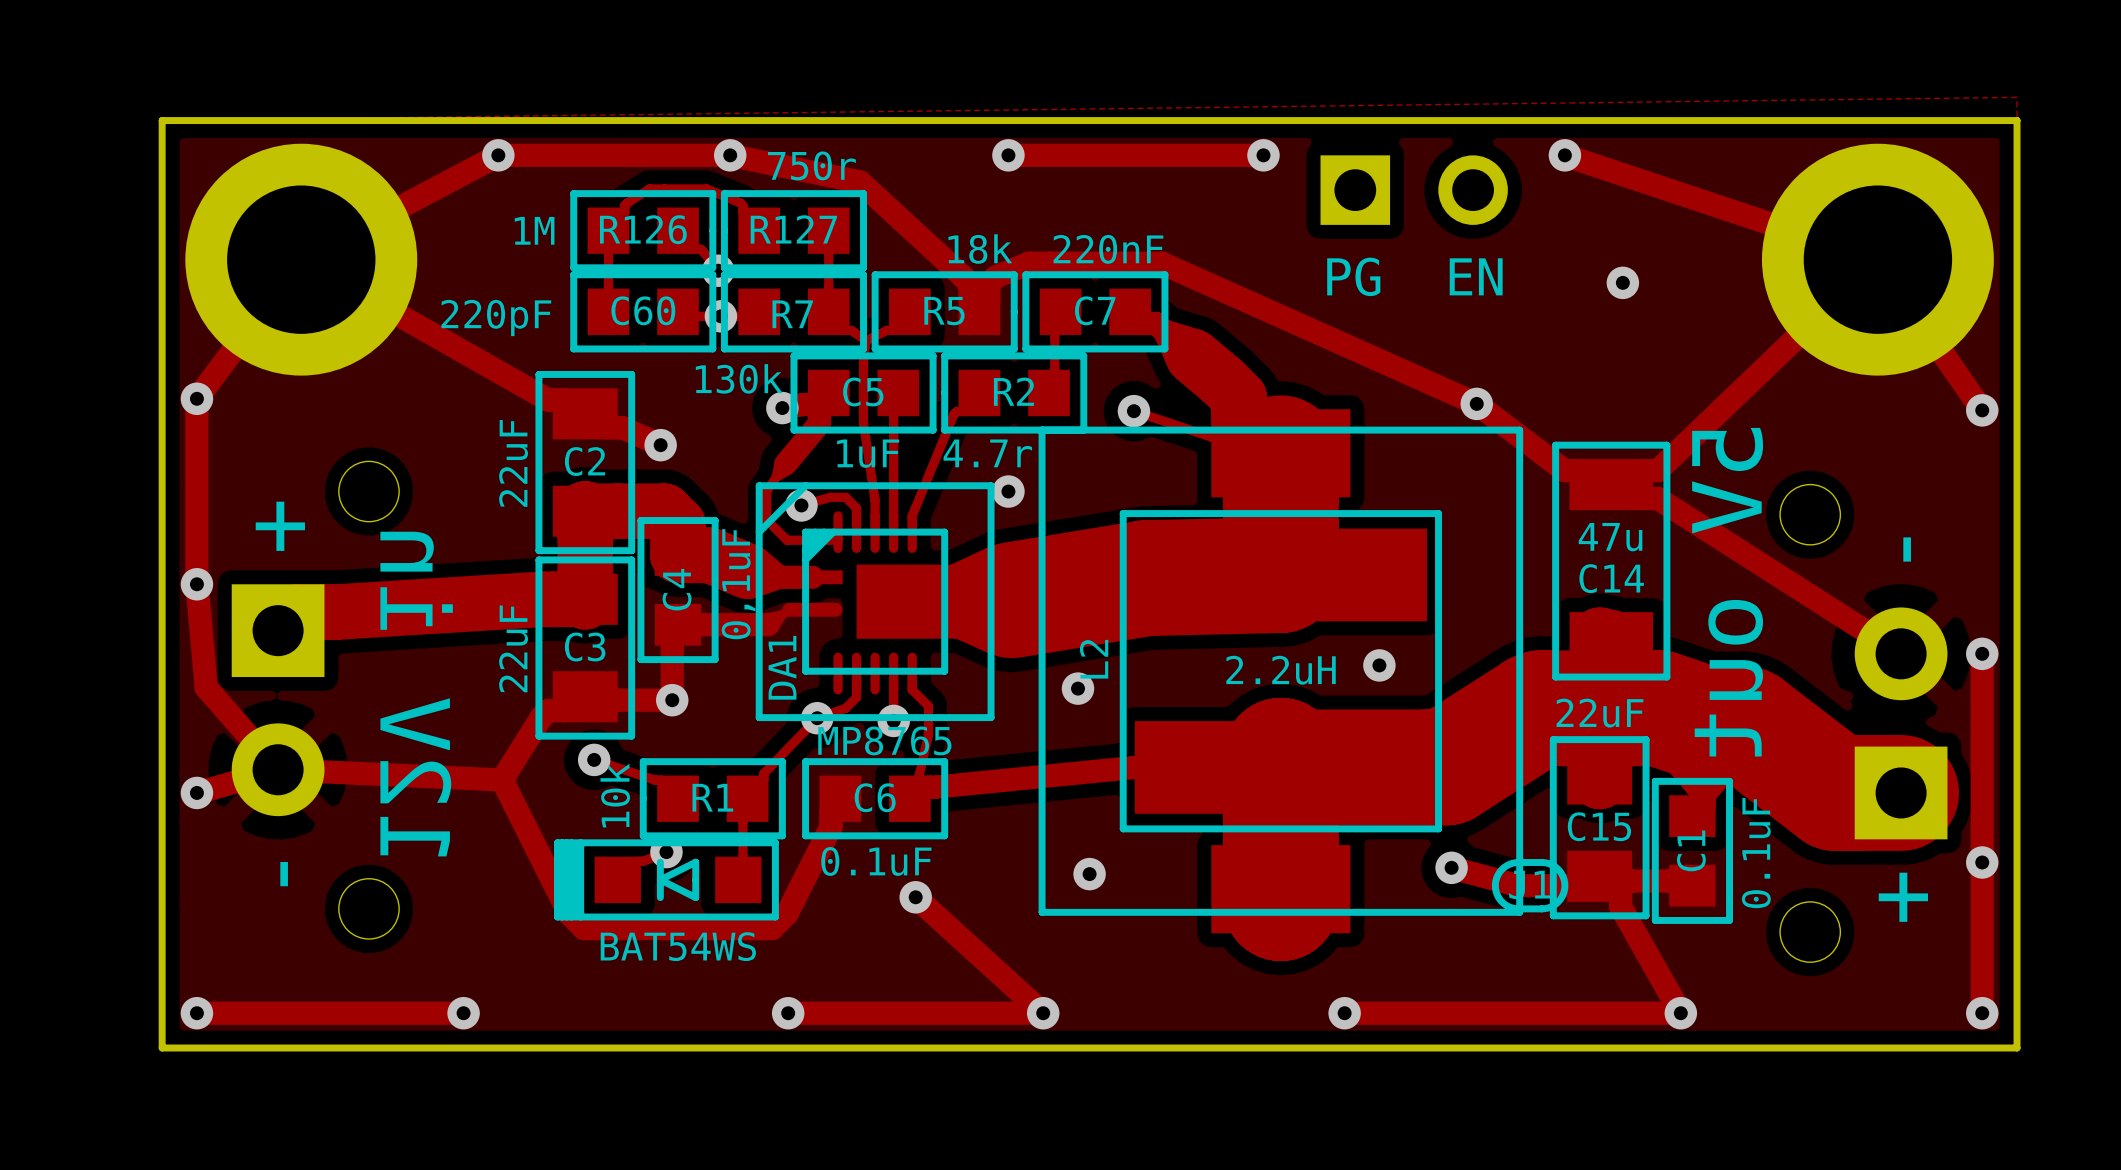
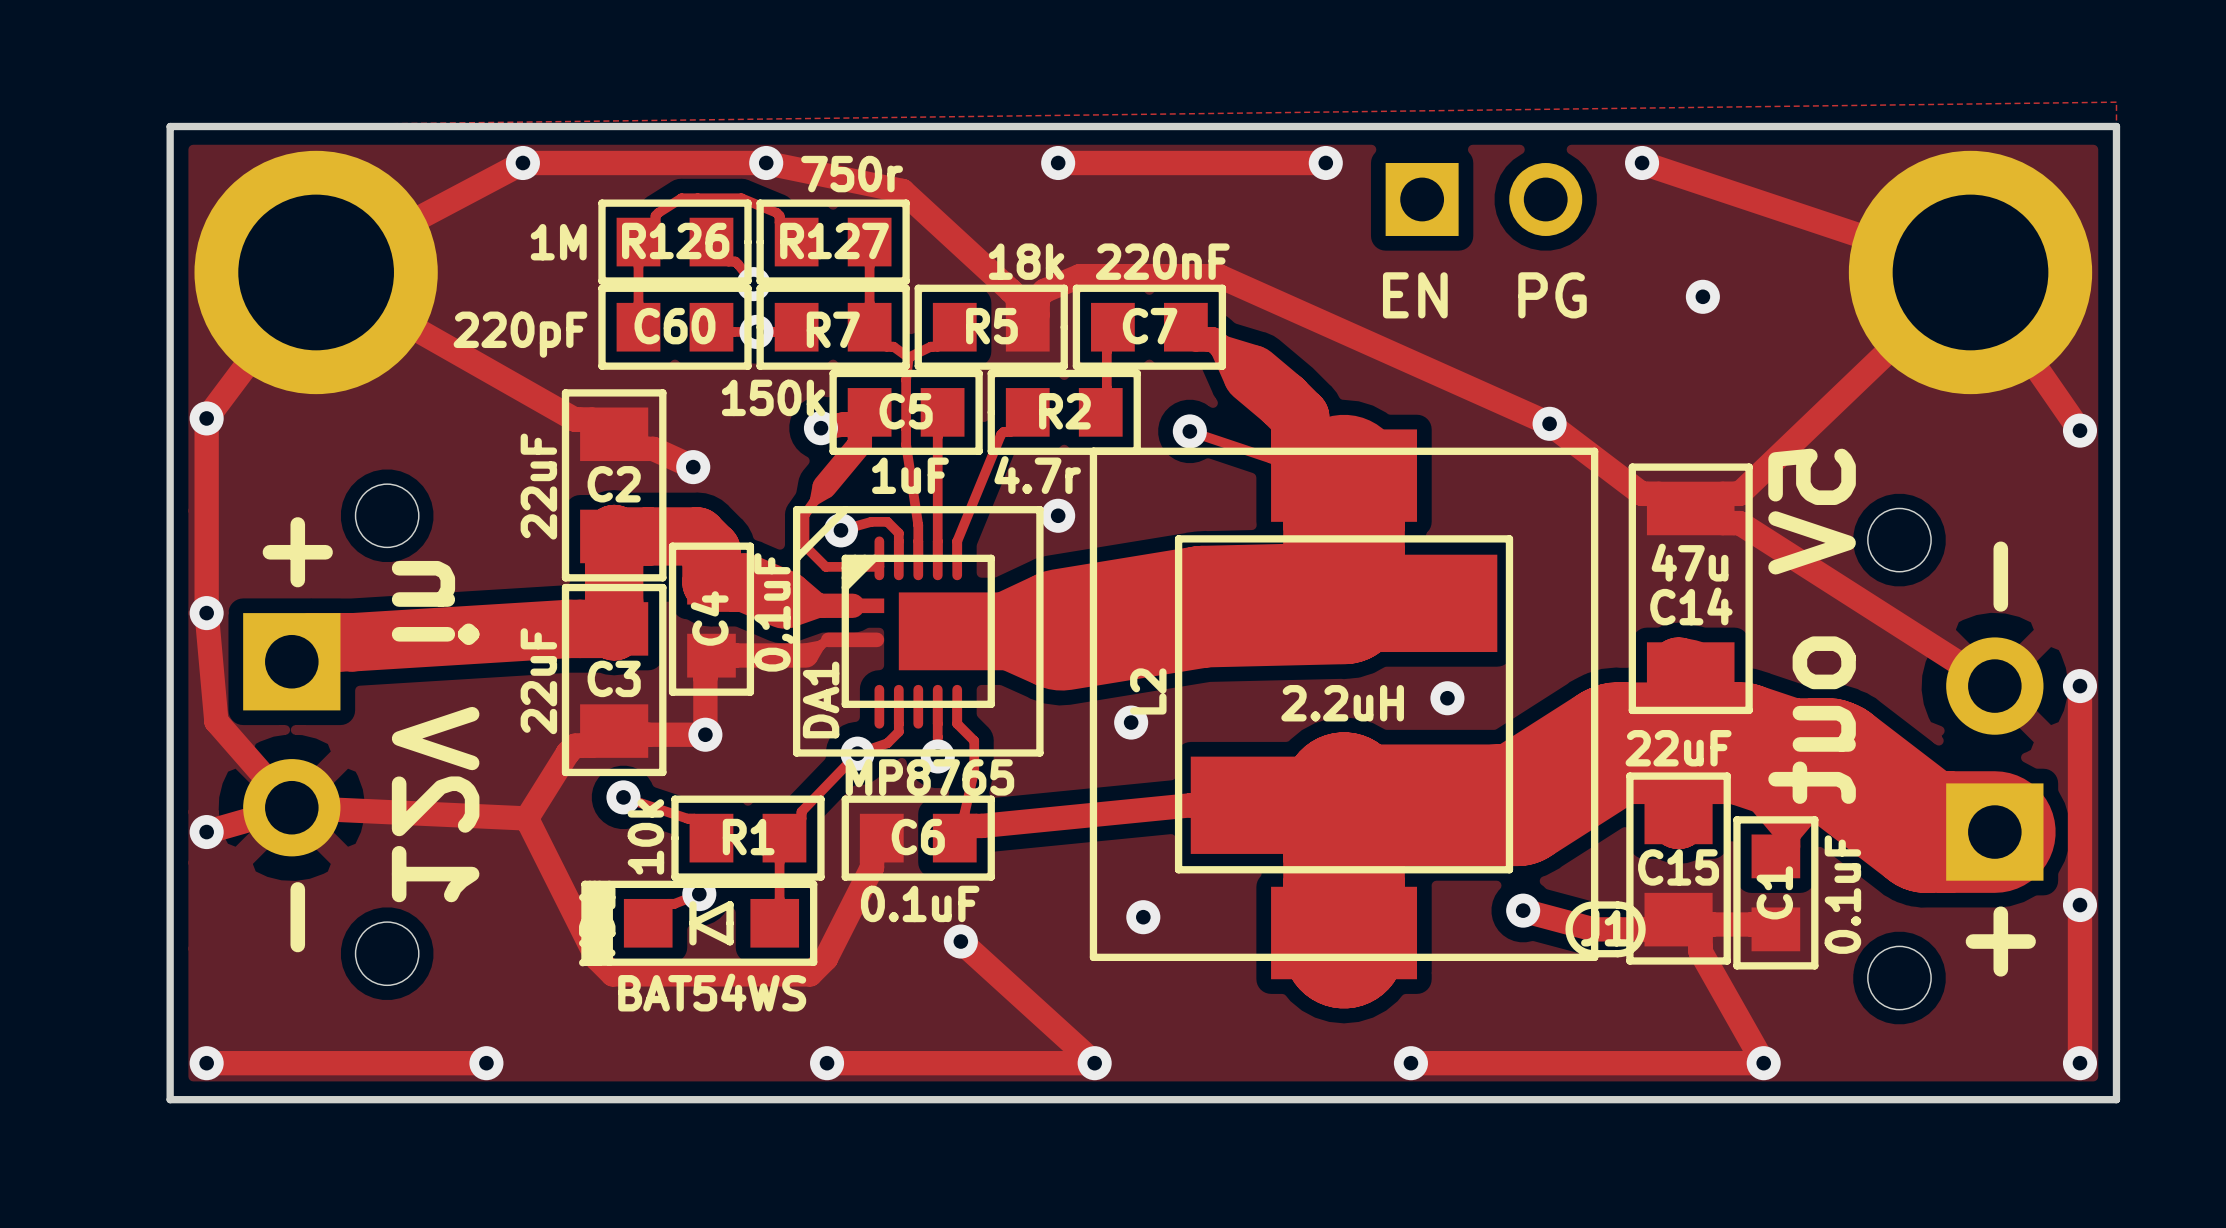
text: PG EN (1414, 276) -> EN PG (1484, 295)
R7 value: 130k (739, 378) -> 150k (773, 397)

